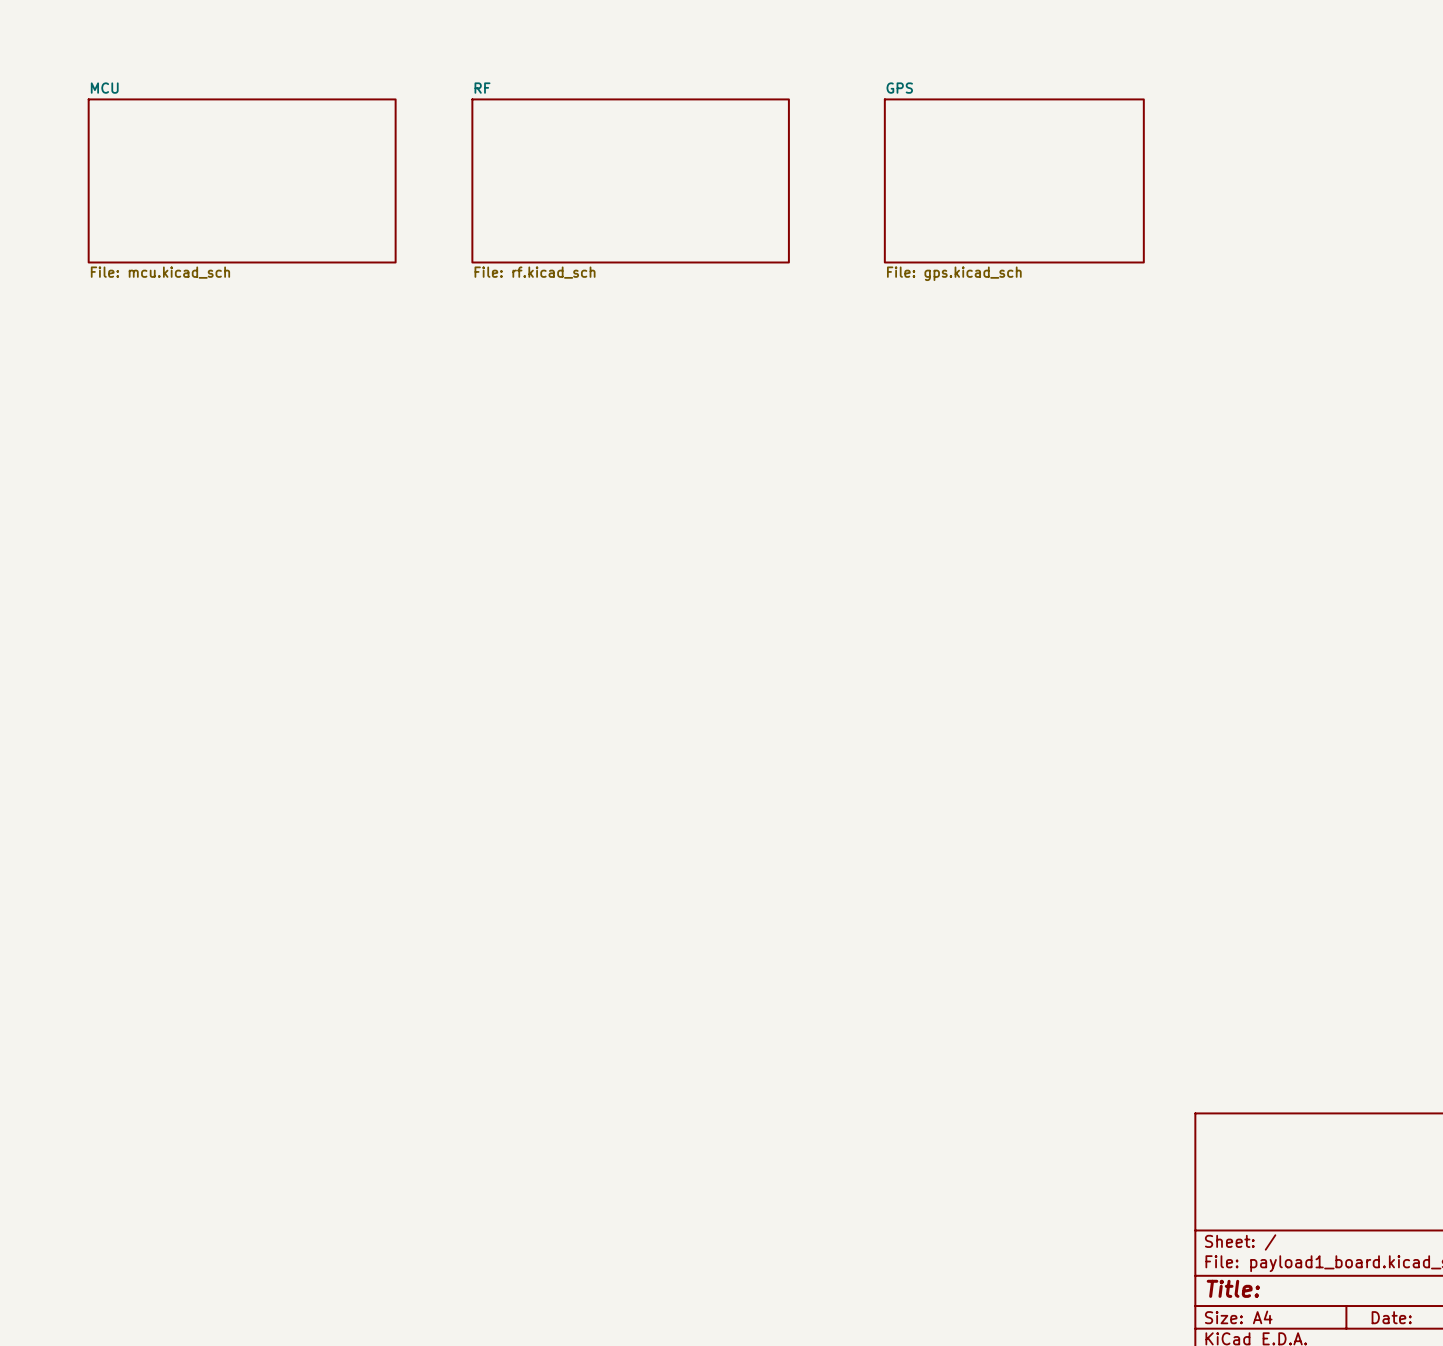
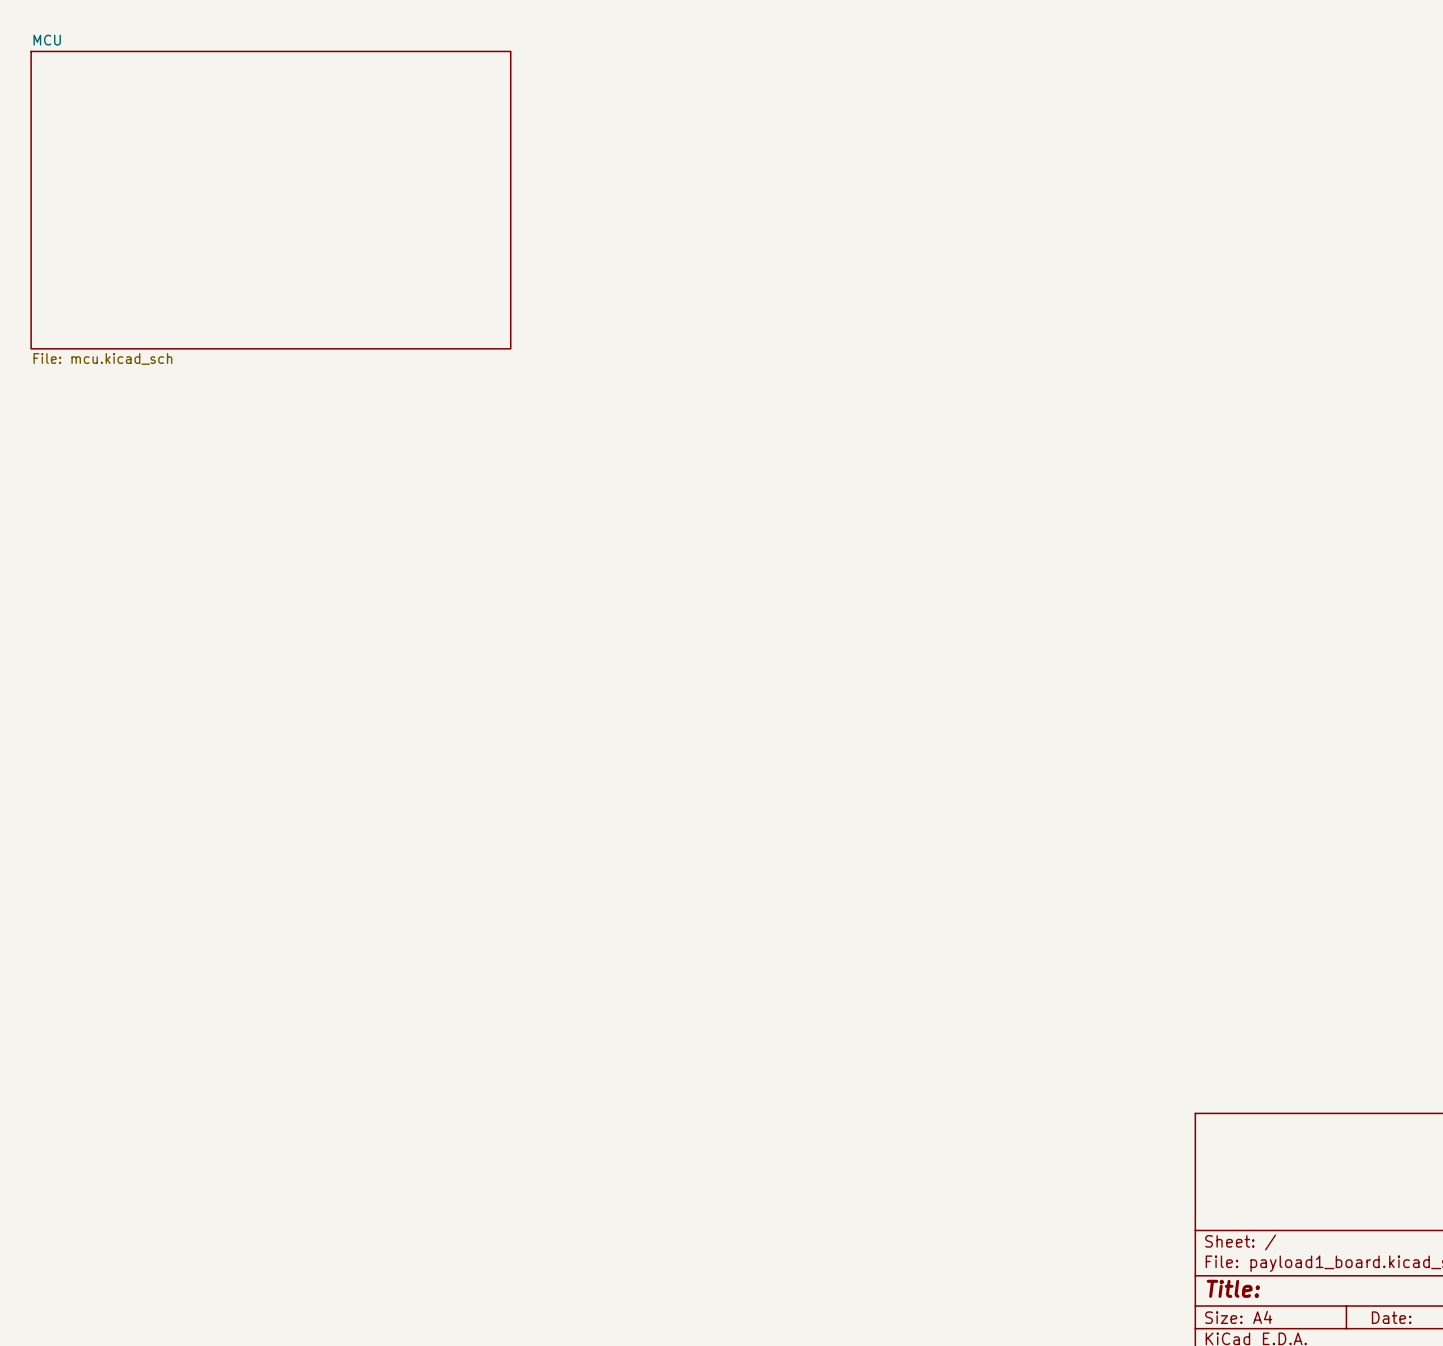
sheet MCU: File: mcu.kicad_sch (242, 180) -> none
sheet RF: File: rf.kicad_sch (630, 180) -> none
sheet GPS: File: gps.kicad_sch (1014, 180) -> none
sheet MCU: none -> File: mcu.kicad_sch (270, 200)

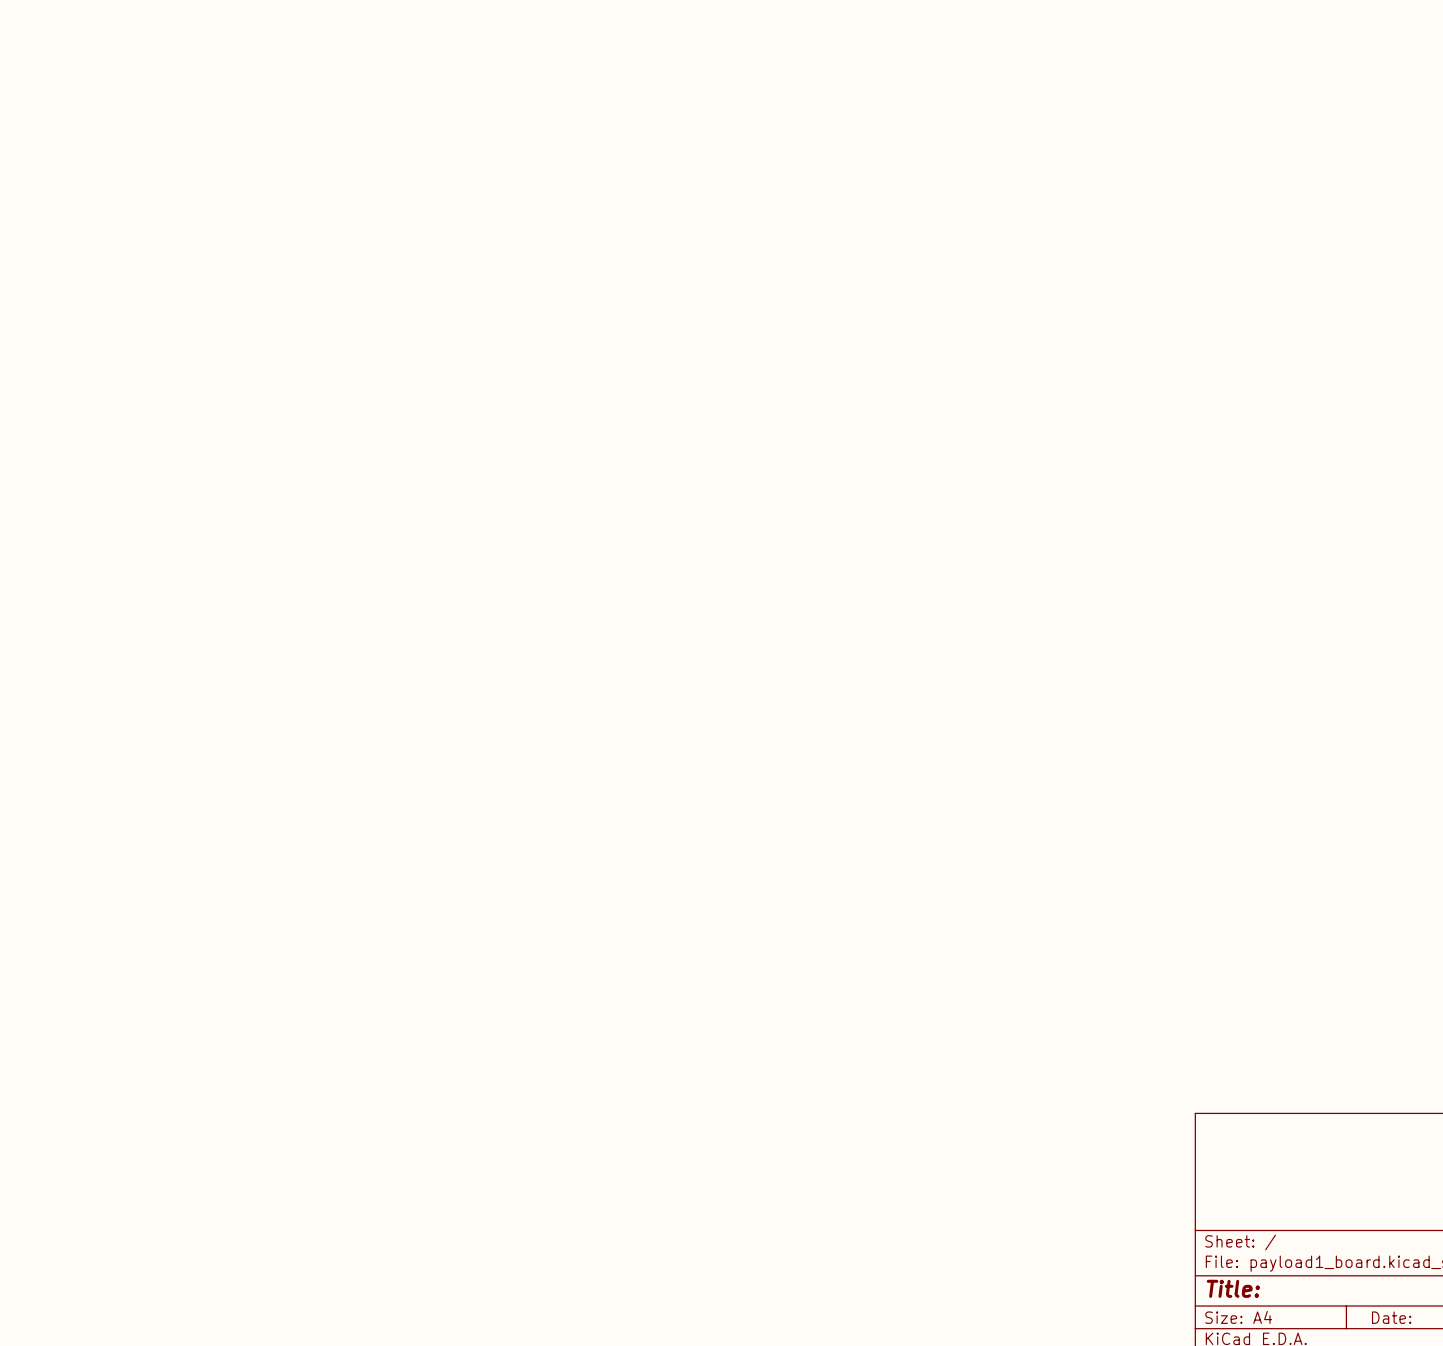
sheet MCU: File: mcu.kicad_sch (270, 200) -> none

